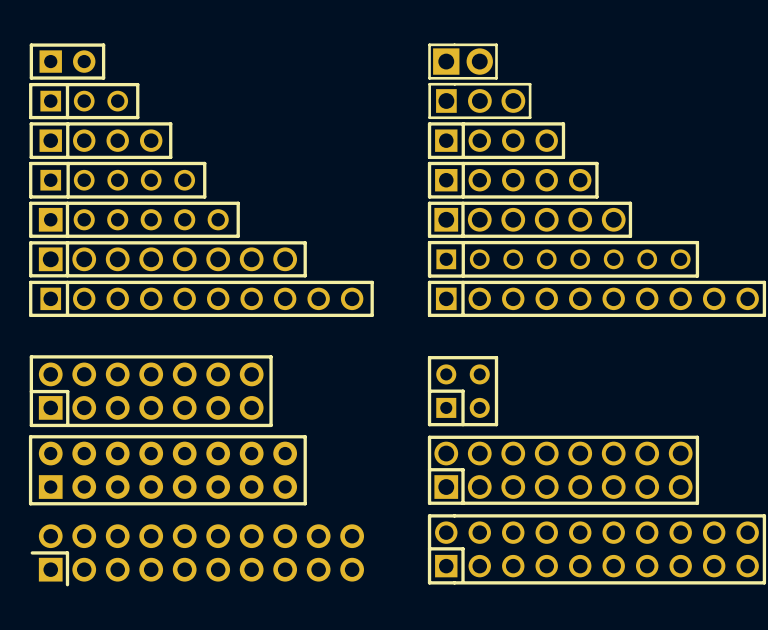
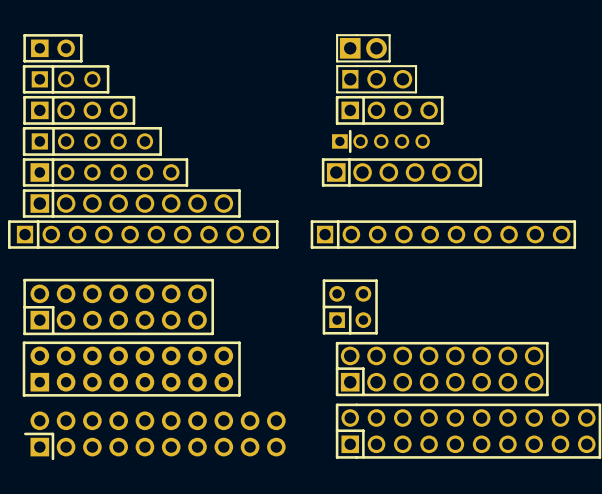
part: none -> (380, 141)
part: (513, 180) -> none
part position: (529, 219) -> (401, 172)
part: (563, 259) -> none
part position: (201, 298) -> (143, 234)
part position: (596, 298) -> (443, 234)
part position: (463, 391) -> (350, 306)

